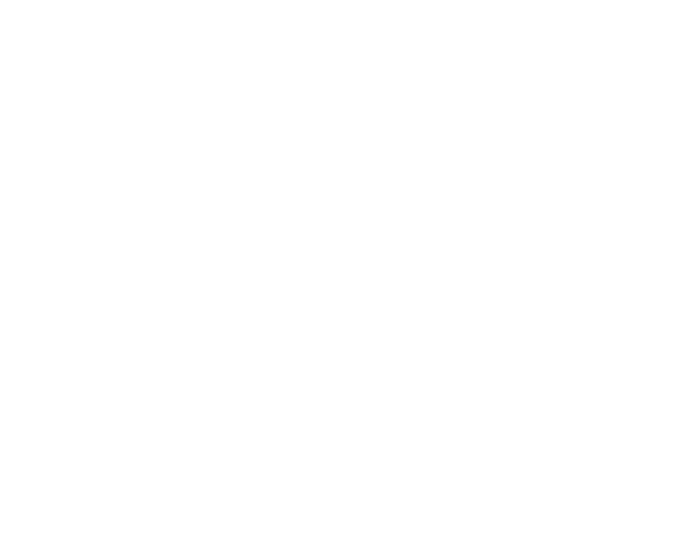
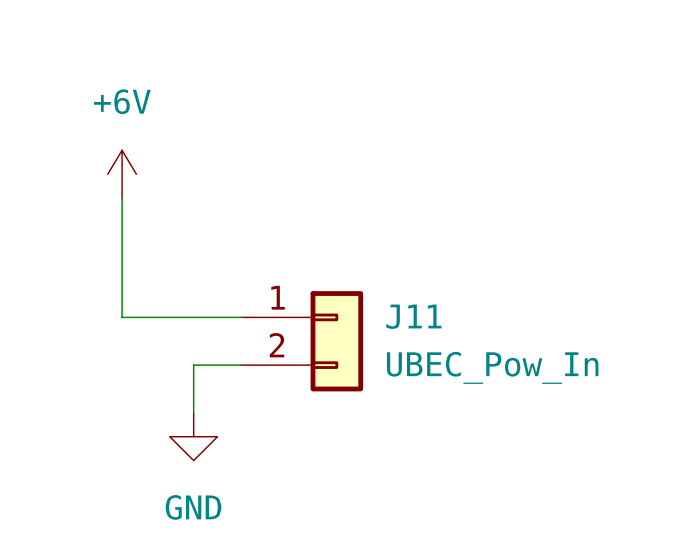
power symbol: none -> +6V (122, 174)
wire: none -> (122, 198) (122, 317) (241, 317)
J11: none -> UBEC_Pow_In (302, 341)
wire: none -> (241, 365) (193, 365) (193, 412)
power symbol: none -> GND (193, 436)

